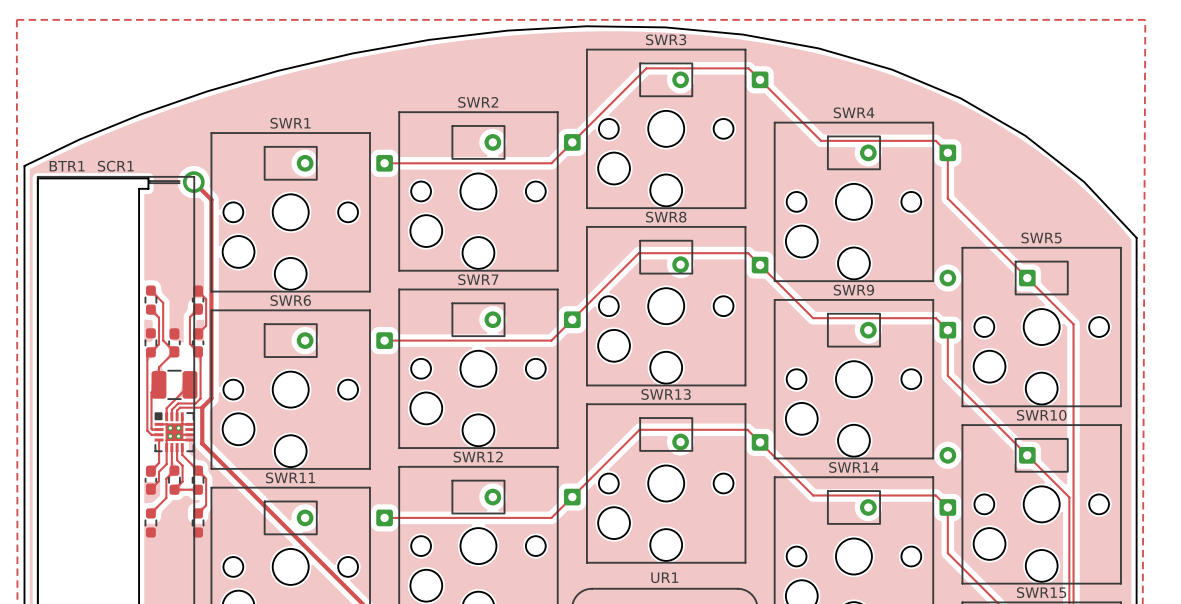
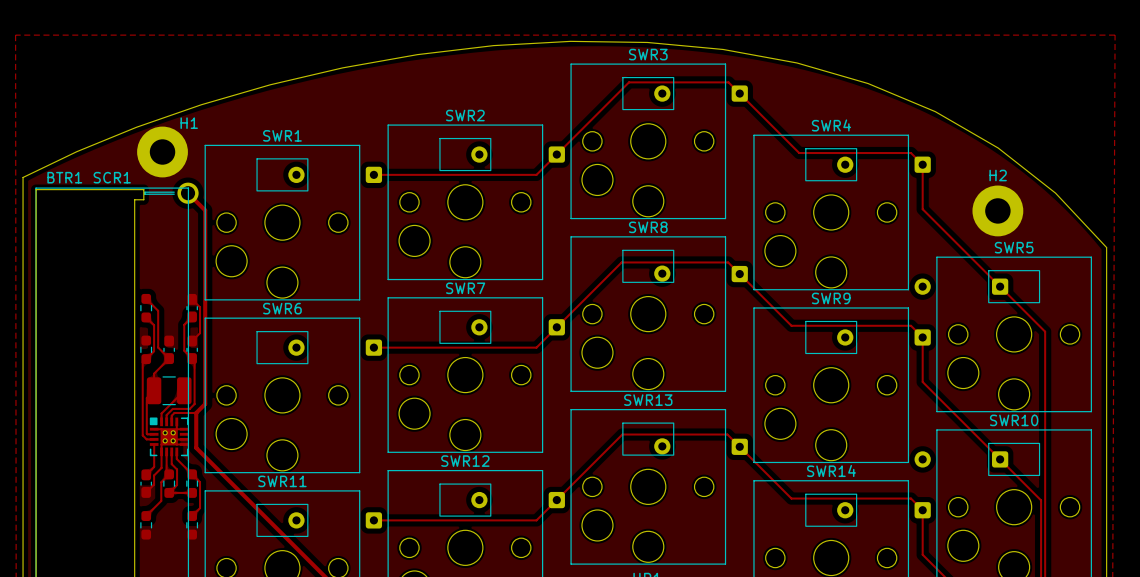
H1: none -> (162, 152)
H2: none -> (997, 210)

